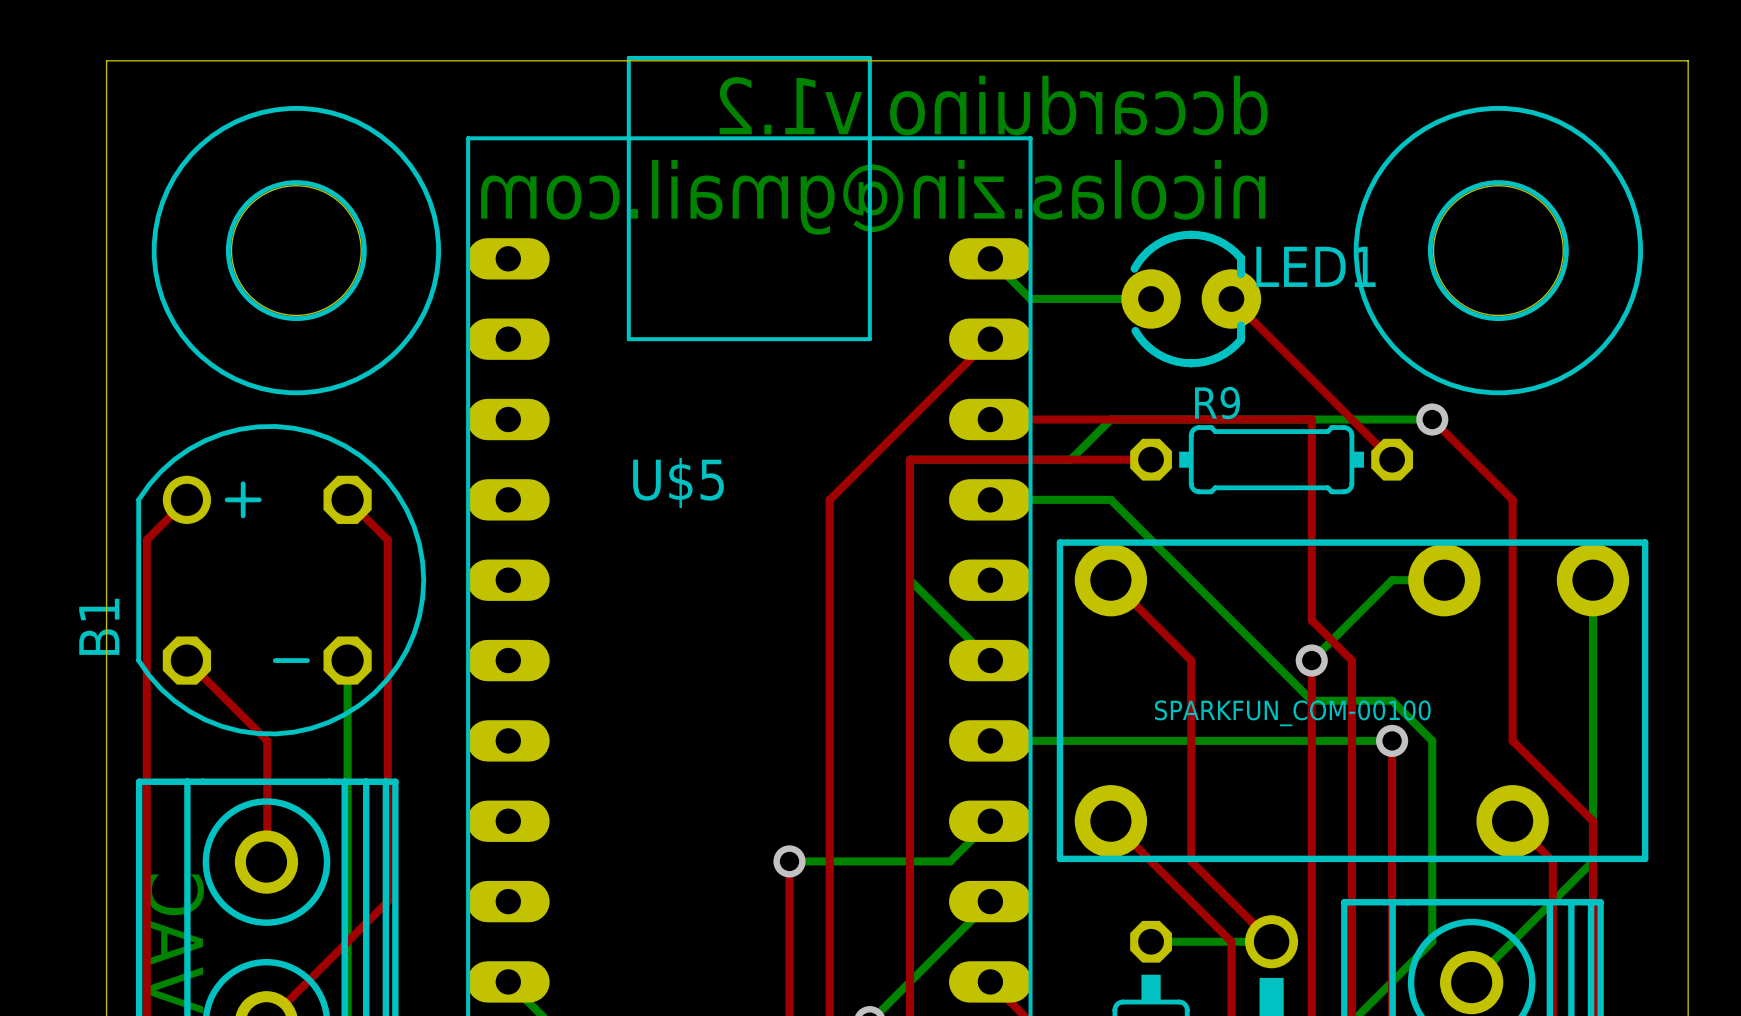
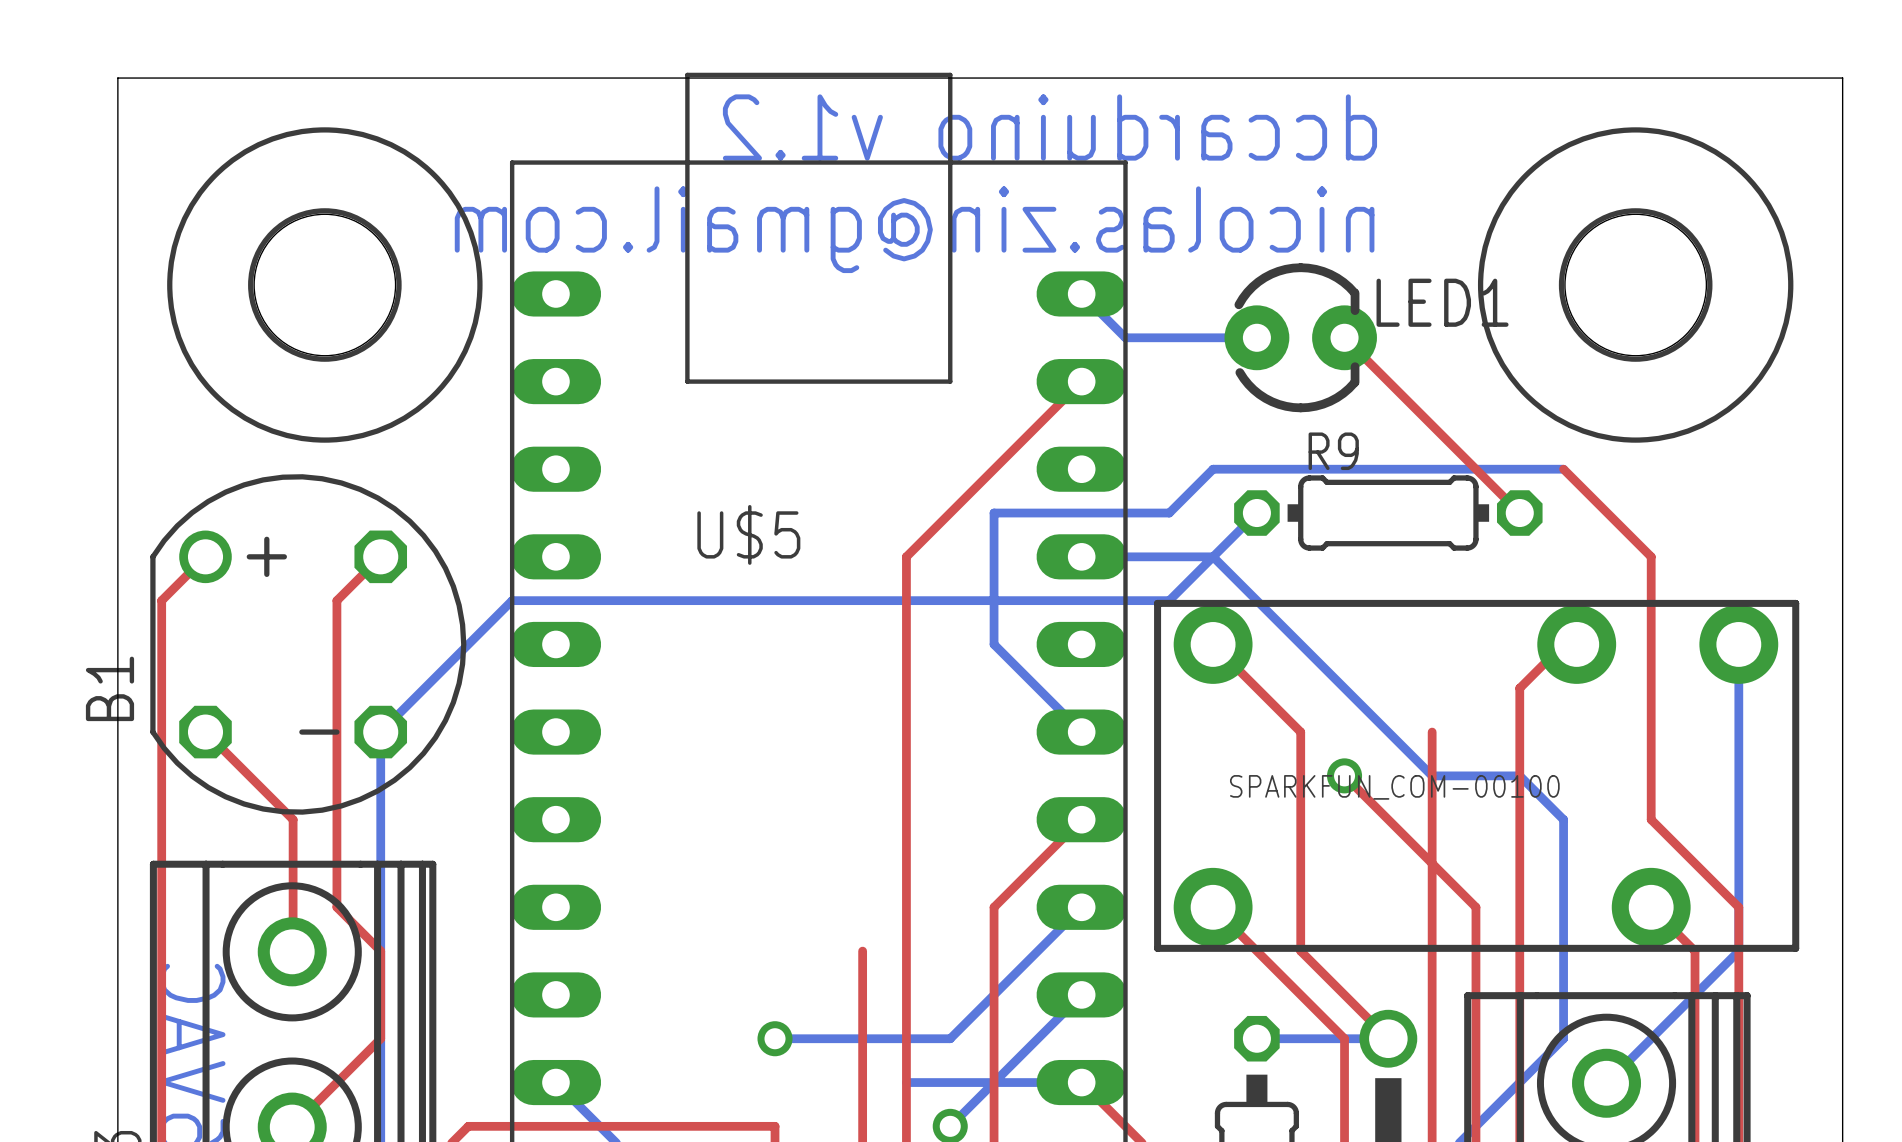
top track: (990, 419) (1311, 419) (1311, 620) (1351, 660) (1351, 821) -> (1344, 775) (1475, 907)
via: (1432, 419) -> none
bottom track: none -> (1256, 513) (1169, 600) (512, 600) (380, 732)
top track: (1151, 459) (910, 459) (910, 821) -> (1081, 819) (994, 907)
top track: (347, 499) (387, 540) (387, 901) (347, 941) -> (380, 556) (336, 600) (336, 907) (380, 951) (380, 1038)
bottom track: (1444, 580) (1392, 580) (1311, 660) -> none
top track: none -> (1576, 644) (1563, 644) (1519, 688) (1519, 819)
via: (1311, 660) -> none
via: none -> (1344, 775)
bottom track: (990, 740) (1392, 740) -> none
via: (1392, 740) -> none
bottom track: (789, 861) (950, 861) -> (775, 1038) (950, 1038) (1037, 951)
via position: (789, 861) -> (775, 1038)
bottom track: none -> (906, 1082) (1081, 1082)

